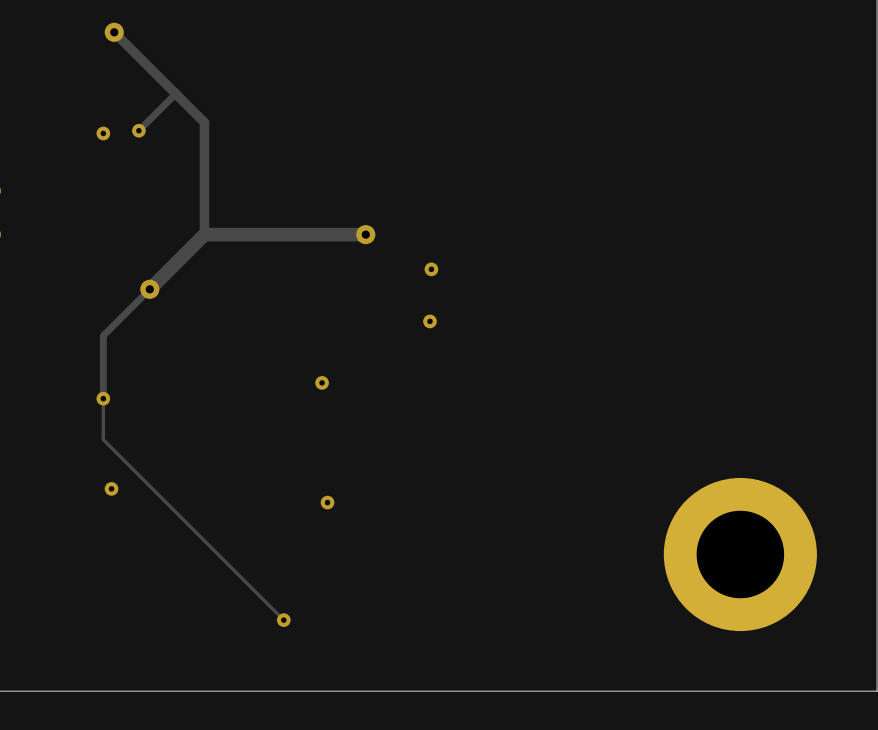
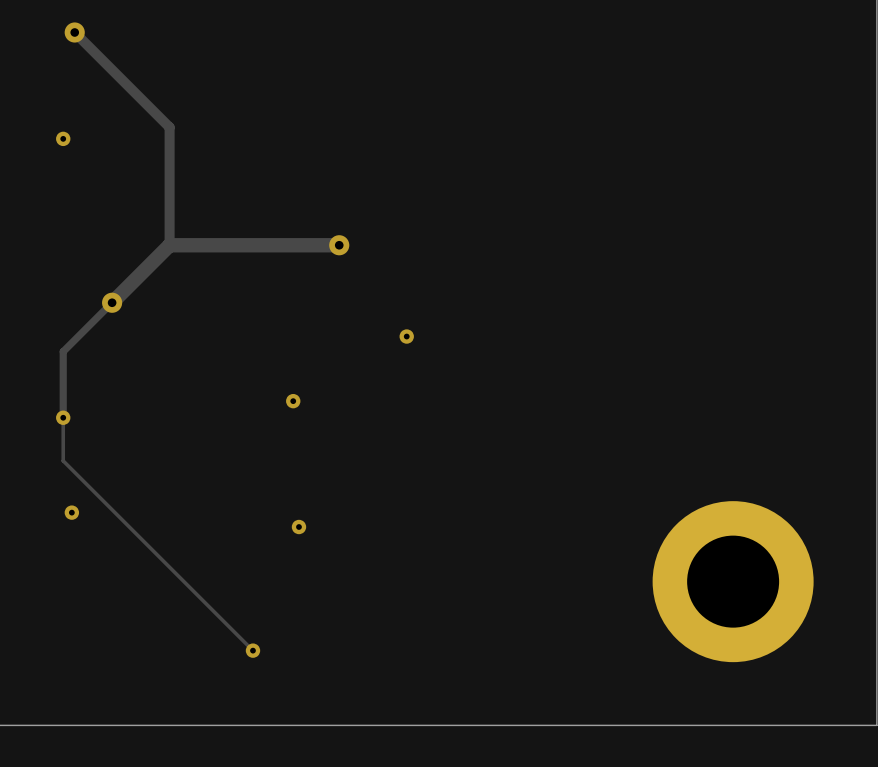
track: (175, 93) (138, 130) -> none
via: (138, 130) -> none
via: (431, 269) -> none

